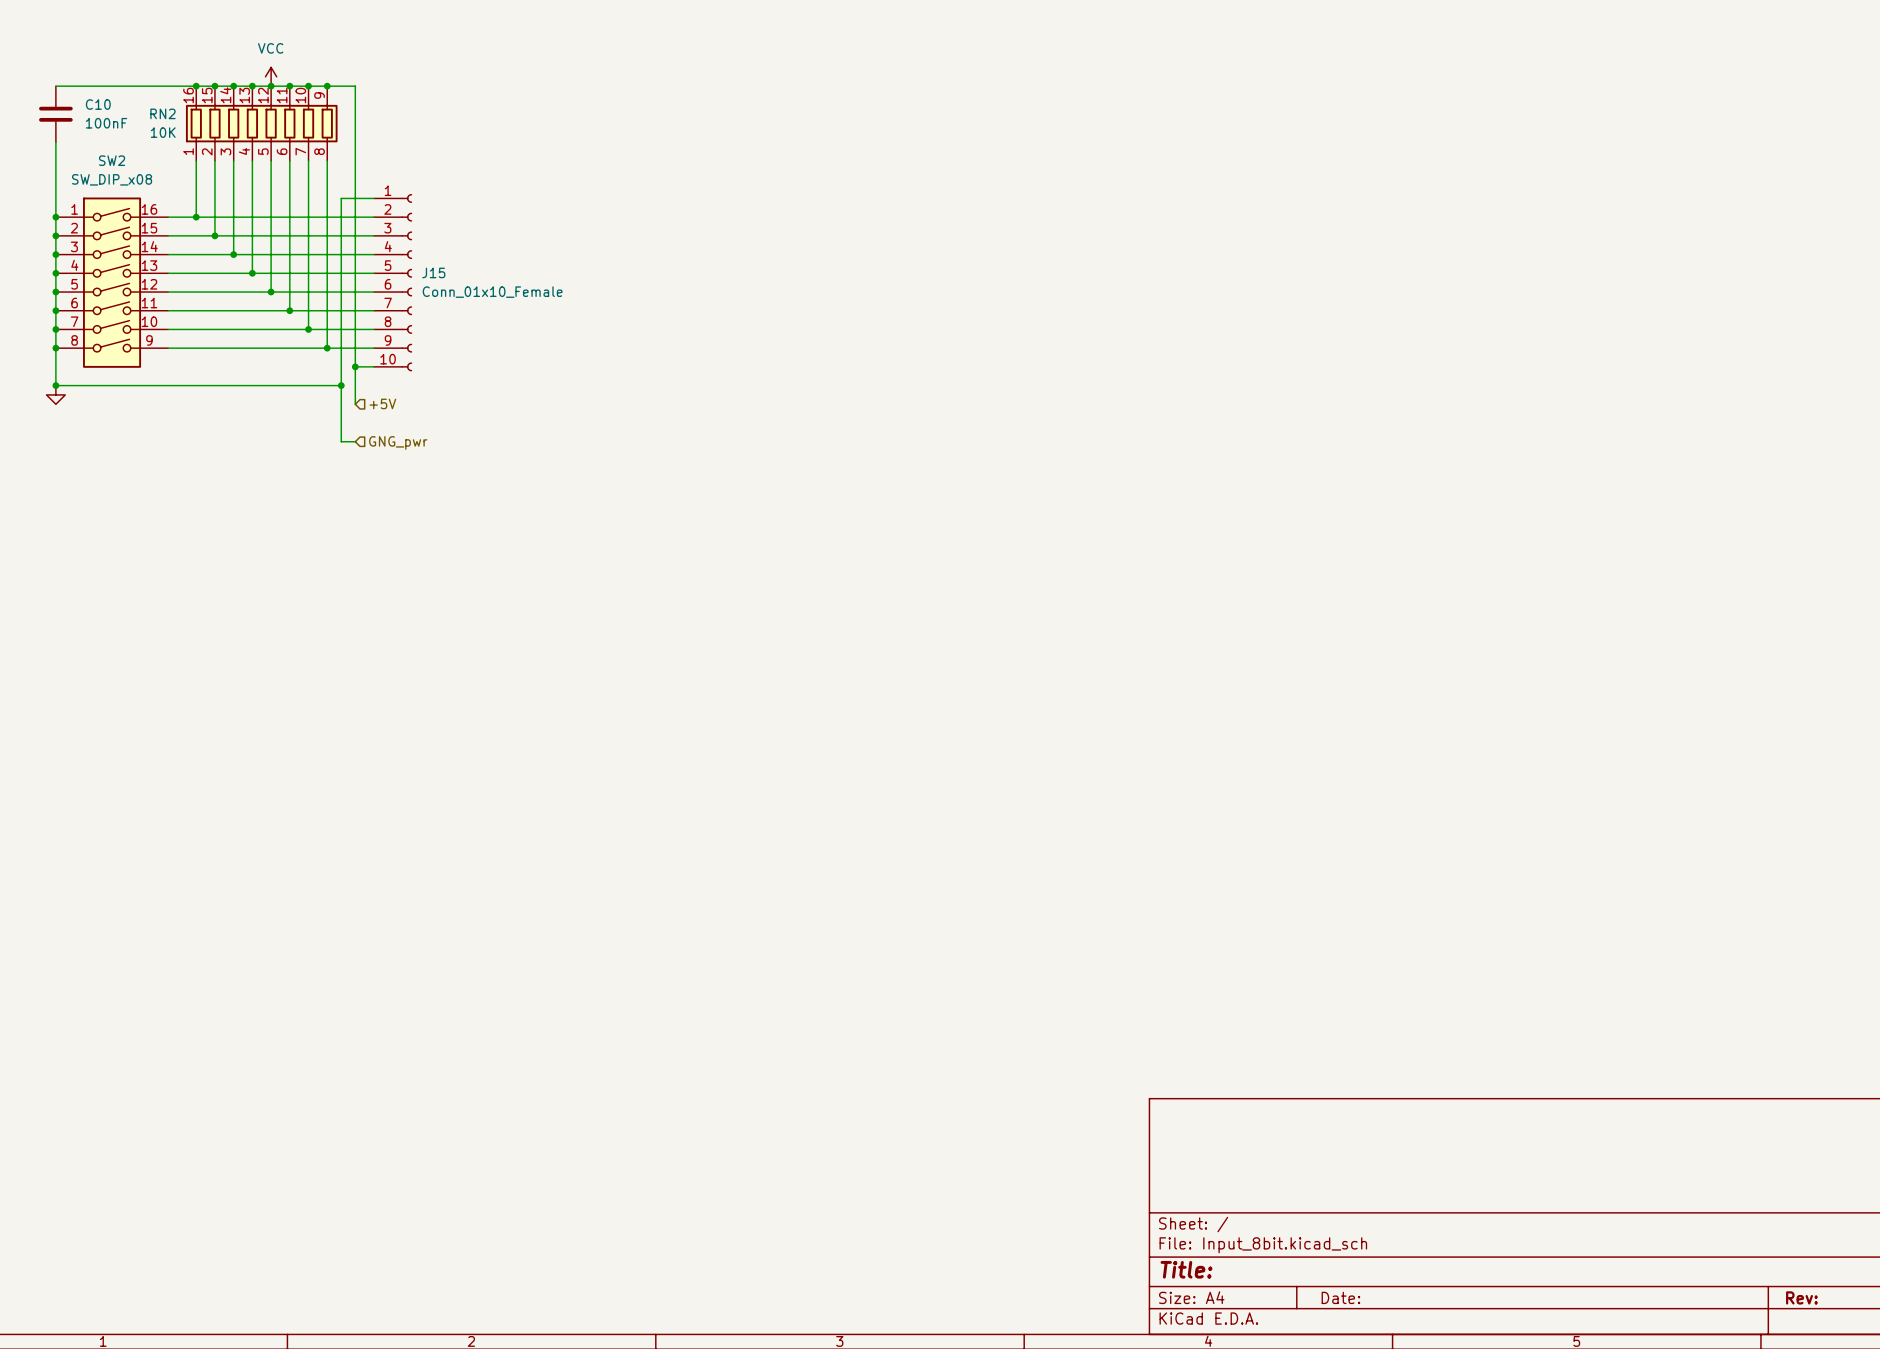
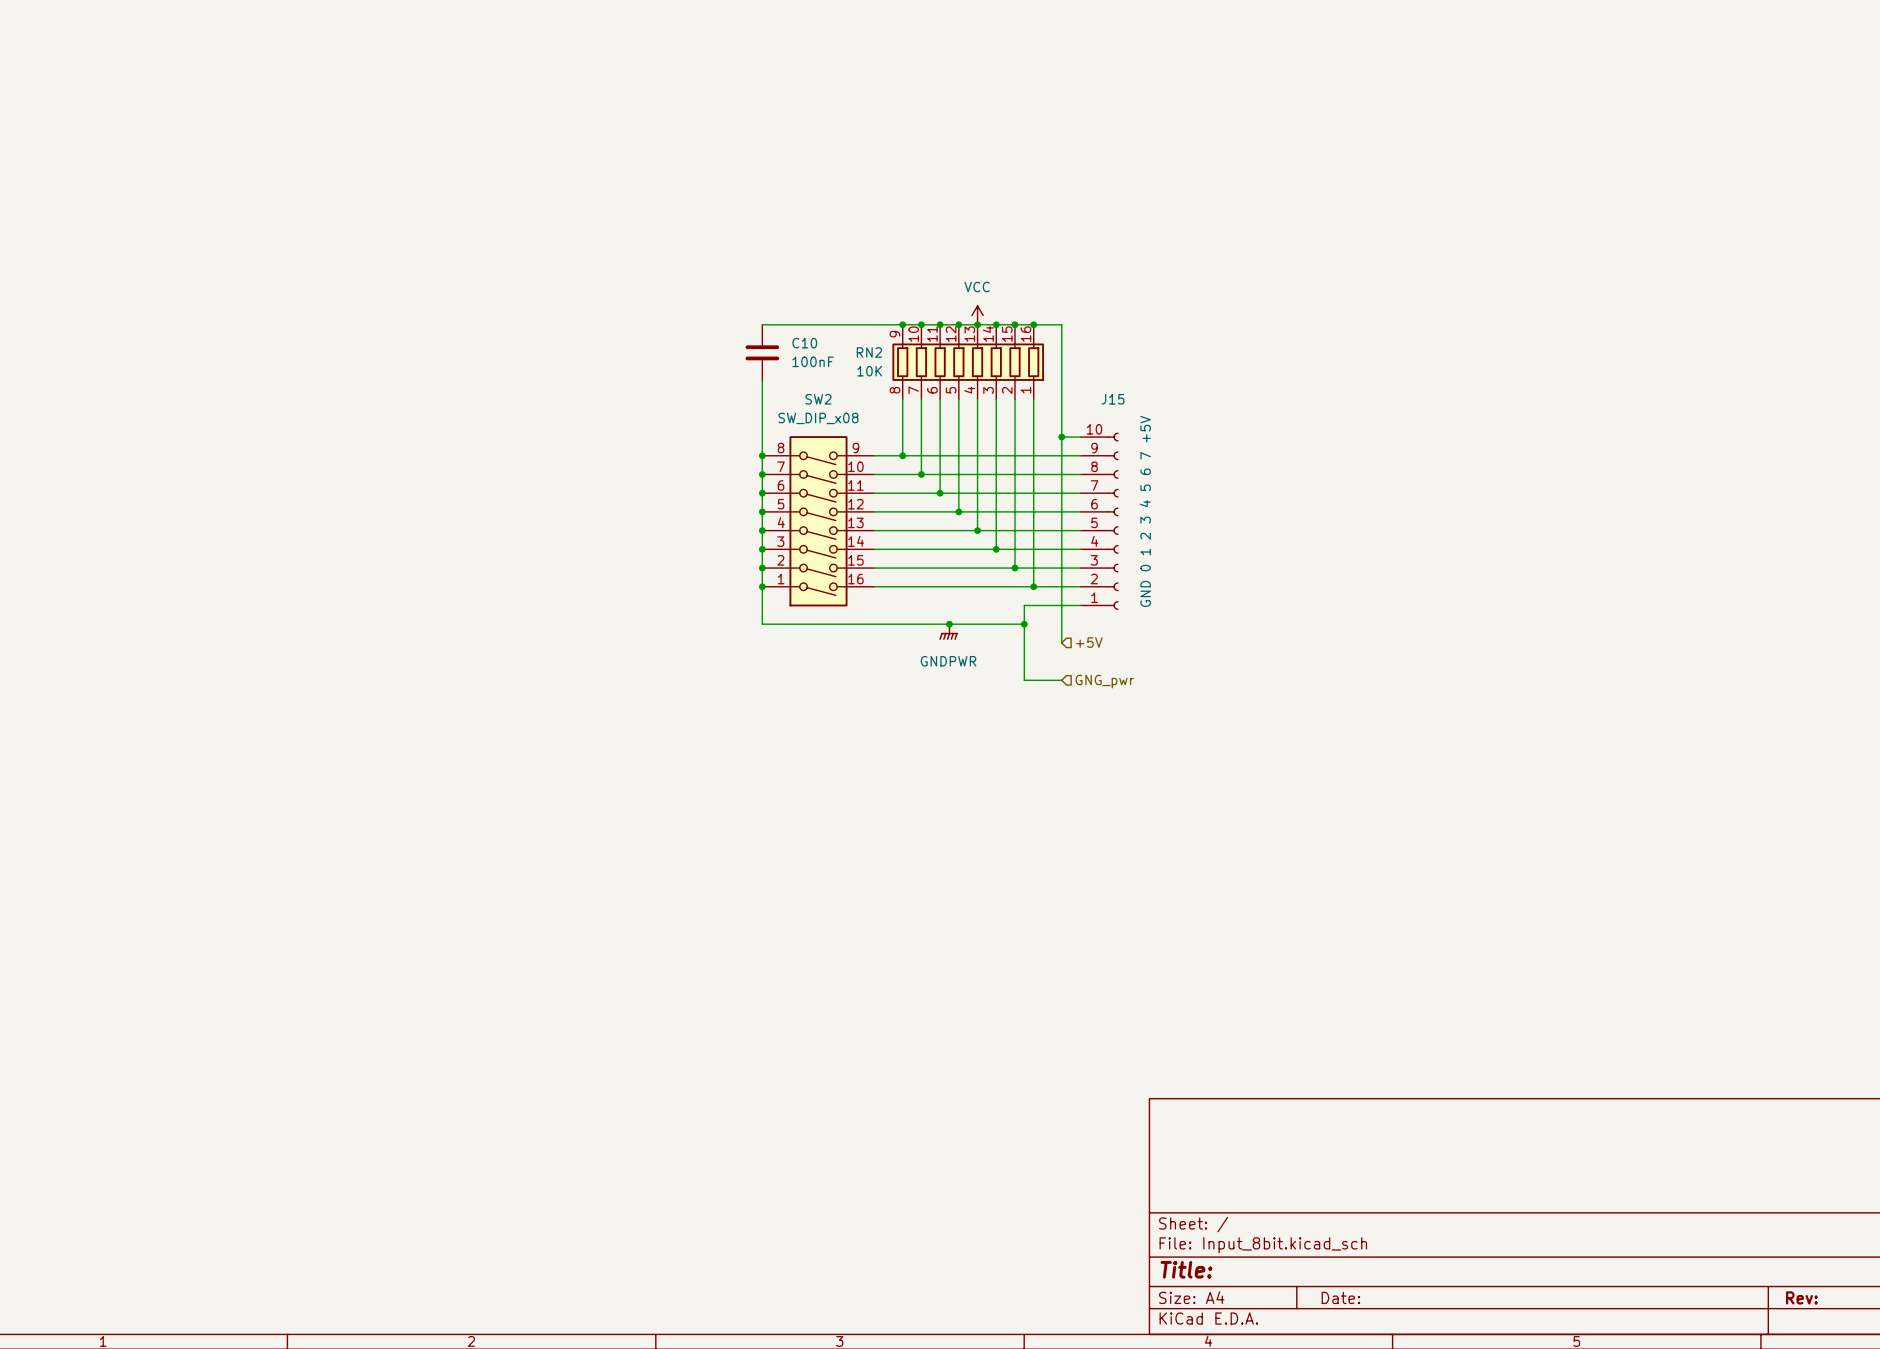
power symbol: VCC (271, 76) -> none
wire: (55, 86) (355, 86) (355, 404) -> none
junction: (196, 86) -> none
junction: (214, 86) -> none
junction: (233, 86) -> none
junction: (252, 86) -> none
junction: (271, 86) -> none
junction: (289, 86) -> none
junction: (308, 86) -> none
junction: (327, 86) -> none
C10 position: (55, 114) -> (762, 352)
RN2 flip: as is (261, 123) -> left-right (968, 362)
RN2 position: (261, 123) -> (968, 362)
wire: (55, 142) (55, 385) (341, 385) -> none
wire: (196, 161) (196, 217) -> none
wire: (214, 161) (214, 235) -> none
wire: (233, 161) (233, 254) -> none
wire: (252, 161) (252, 273) -> none
wire: (271, 161) (271, 292) -> none
wire: (289, 161) (289, 310) -> none
wire: (308, 161) (308, 329) -> none
wire: (327, 161) (327, 348) -> none
wire: (374, 198) (341, 198) (341, 441) (355, 441) -> none
junction: (55, 217) -> none
wire: (168, 217) (374, 217) -> none
junction: (196, 217) -> none
junction: (55, 235) -> none
wire: (168, 235) (374, 235) -> none
junction: (214, 235) -> none
junction: (55, 254) -> none
wire: (168, 254) (374, 254) -> none
junction: (233, 254) -> none
J15 name position: J15 (433, 272) -> J15 (1113, 399)
junction: (55, 273) -> none
wire: (168, 273) (374, 273) -> none
junction: (252, 273) -> none
SW2 flip: as is (112, 282) -> up-down (818, 521)
SW2 position: (112, 282) -> (818, 521)
J15 position: (393, 282) -> (1099, 521)
J15 flip: as is (406, 282) -> up-down (1113, 521)
junction: (55, 292) -> none
wire: (168, 292) (374, 292) -> none
junction: (271, 292) -> none
J15 value: Conn_01x10_Female (492, 292) -> GND 0 1 2 3 4 5 6 7 +5V (1145, 511)
junction: (55, 310) -> none
wire: (168, 310) (374, 310) -> none
junction: (289, 310) -> none
power symbol: none -> VCC (977, 315)
wire: none -> (762, 324) (1061, 324) (1061, 642)
junction: none -> (902, 324)
junction: none -> (921, 324)
junction: none -> (940, 324)
junction: none -> (958, 324)
junction: none -> (977, 324)
junction: none -> (996, 324)
junction: none -> (1014, 324)
junction: none -> (1033, 324)
junction: (55, 329) -> none
wire: (168, 329) (374, 329) -> none
junction: (308, 329) -> none
junction: (55, 348) -> none
wire: (168, 348) (374, 348) -> none
junction: (327, 348) -> none
wire: (355, 366) (374, 366) -> none
junction: (355, 366) -> none
wire: none -> (762, 380) (762, 624) (1024, 624)
junction: (55, 385) -> none
junction: (341, 385) -> none
power symbol: (55, 394) -> none
wire: none -> (902, 399) (902, 455)
wire: none -> (921, 399) (921, 474)
wire: none -> (940, 399) (940, 493)
wire: none -> (958, 399) (958, 511)
wire: none -> (977, 399) (977, 530)
wire: none -> (996, 399) (996, 549)
wire: none -> (1014, 399) (1014, 568)
wire: none -> (1033, 399) (1033, 586)
hierarchical label: +5V (382, 403) -> none
wire: none -> (1061, 437) (1080, 437)
junction: none -> (1061, 437)
hierarchical label: GNG_pwr (398, 442) -> none
junction: none -> (762, 455)
wire: none -> (874, 455) (1080, 455)
junction: none -> (902, 455)
junction: none -> (762, 474)
wire: none -> (874, 474) (1080, 474)
junction: none -> (921, 474)
junction: none -> (762, 493)
wire: none -> (874, 493) (1080, 493)
junction: none -> (940, 493)
junction: none -> (762, 511)
wire: none -> (874, 511) (1080, 511)
junction: none -> (958, 511)
junction: none -> (762, 530)
wire: none -> (874, 530) (1080, 530)
junction: none -> (977, 530)
junction: none -> (762, 549)
wire: none -> (874, 549) (1080, 549)
junction: none -> (996, 549)
junction: none -> (762, 568)
wire: none -> (874, 568) (1080, 568)
junction: none -> (1014, 568)
junction: none -> (762, 586)
wire: none -> (874, 586) (1080, 586)
junction: none -> (1033, 586)
wire: none -> (1080, 605) (1024, 605) (1024, 680) (1061, 680)
junction: none -> (949, 624)
junction: none -> (1024, 624)
power symbol: none -> GNDPWR (948, 632)
hierarchical label: none -> +5V (1089, 642)
hierarchical label: none -> GNG_pwr (1104, 681)

